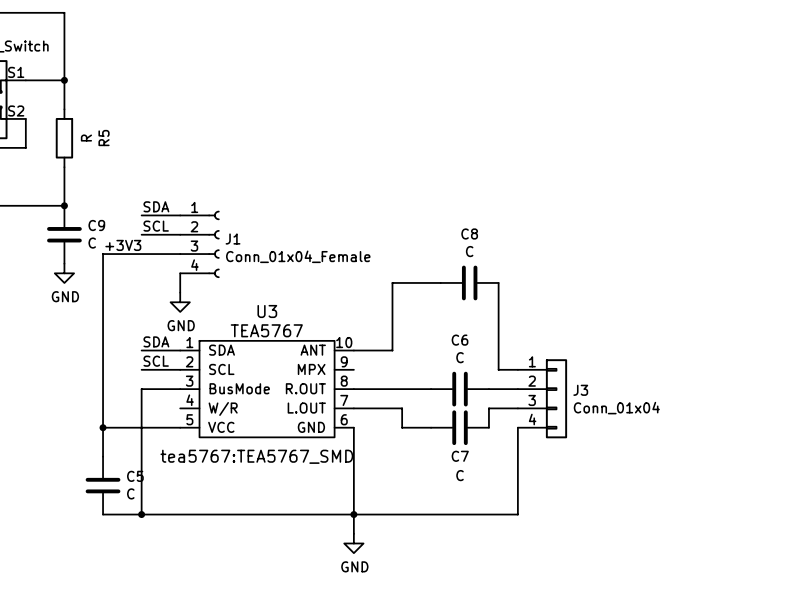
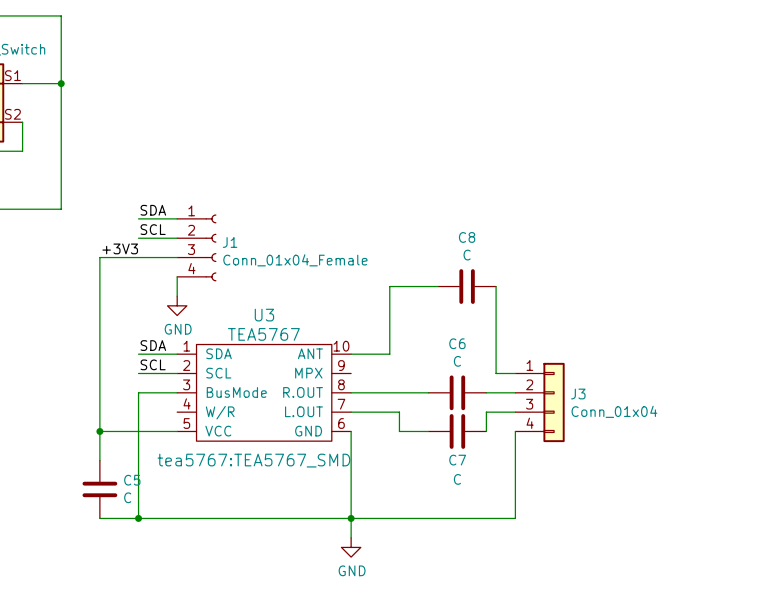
wire: none -> (61, 112) (61, 170)
R5: R (64, 138) -> none
junction: (64, 205) -> none
C9: C (64, 234) -> none
power symbol: GND (64, 273) -> none

